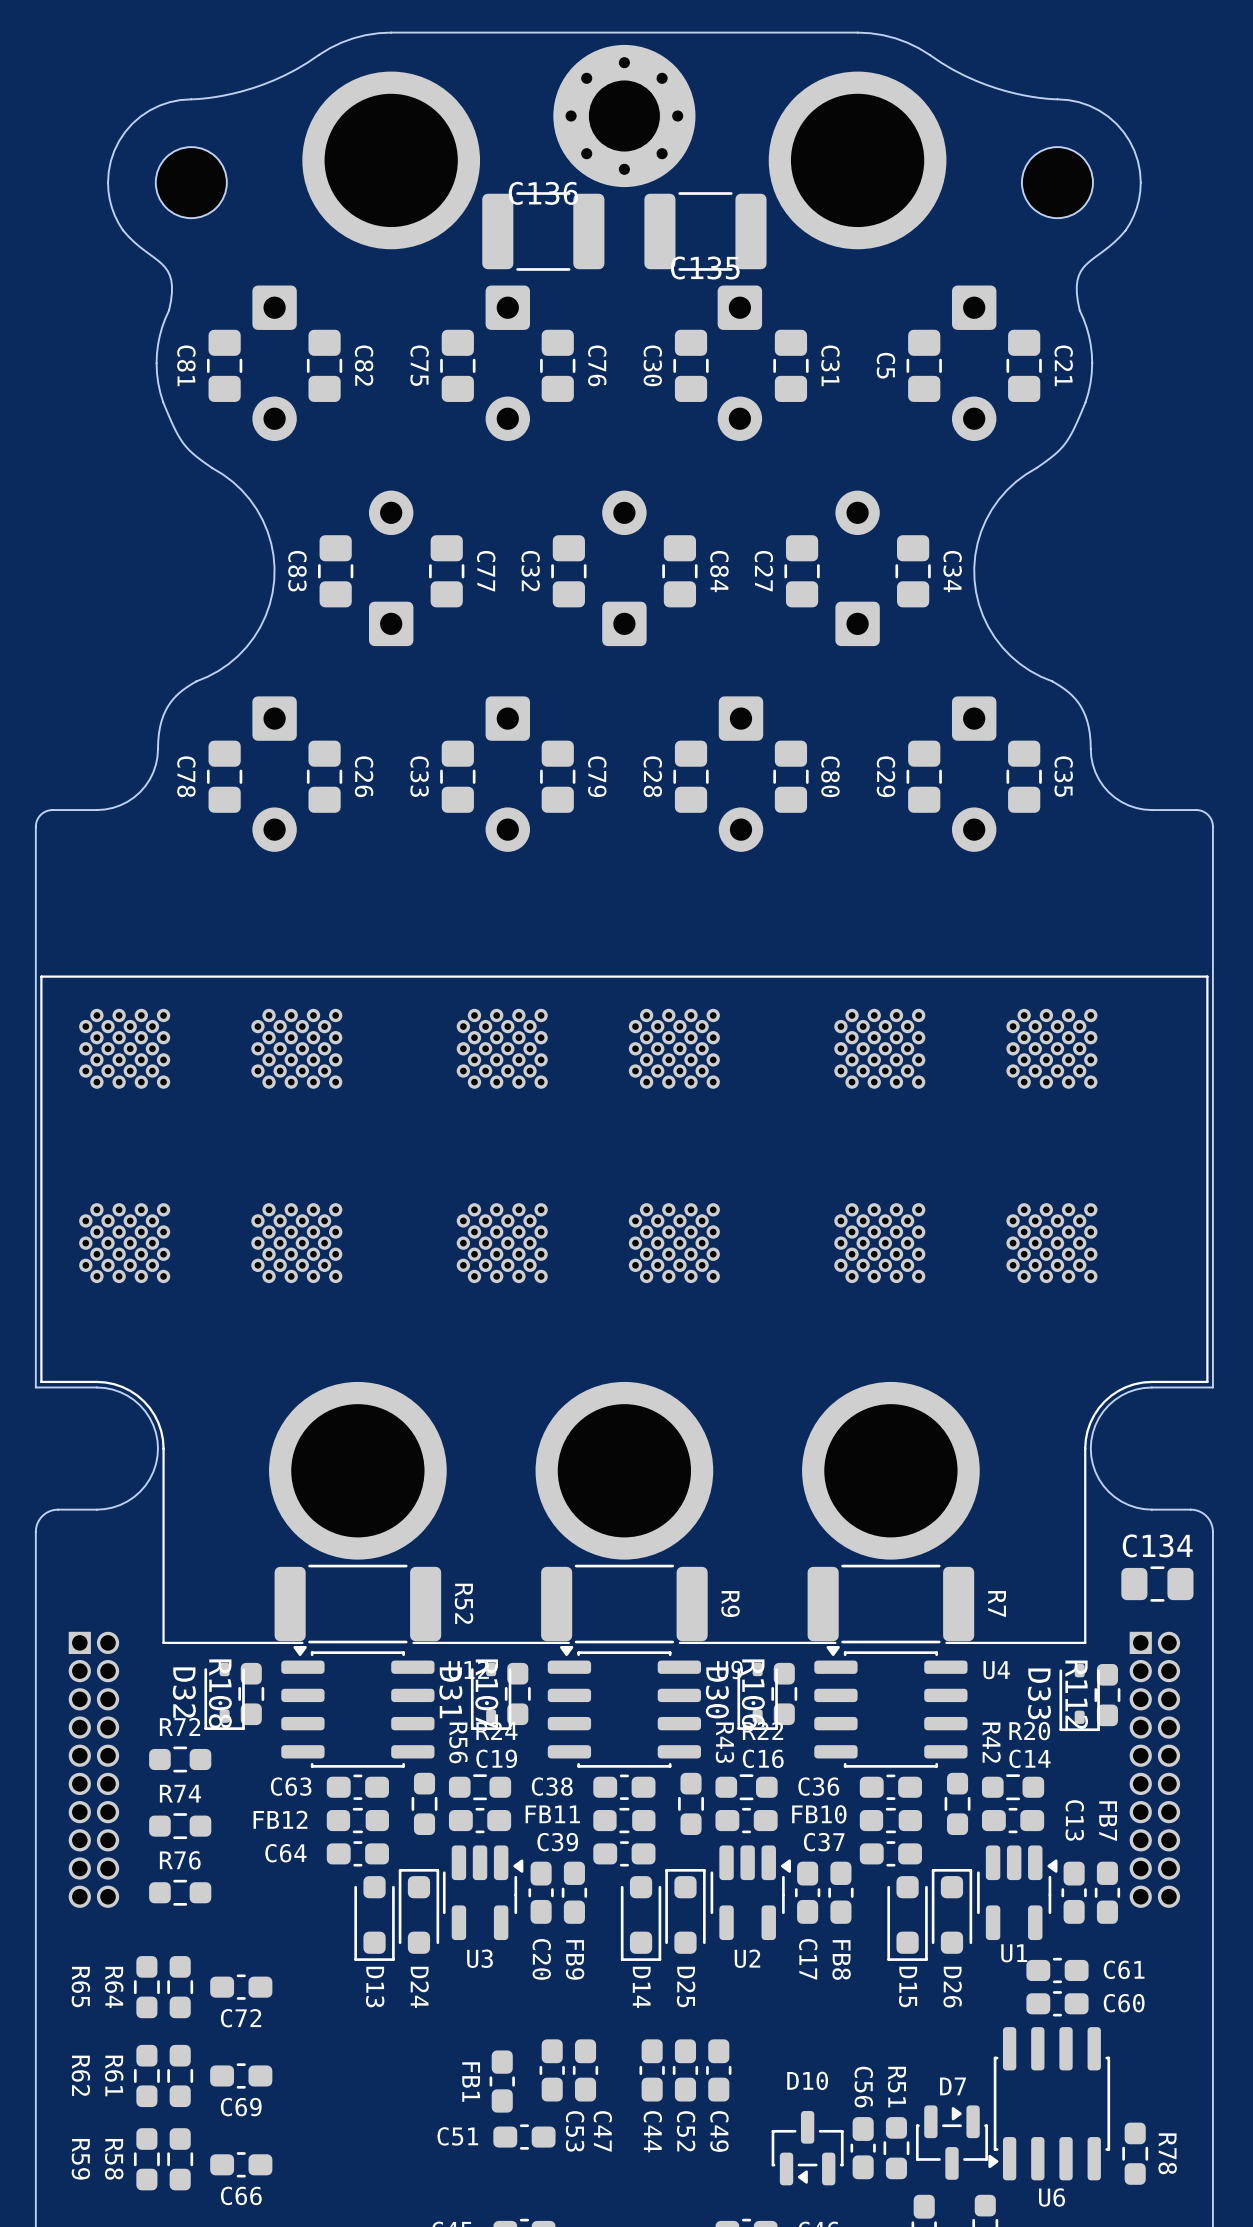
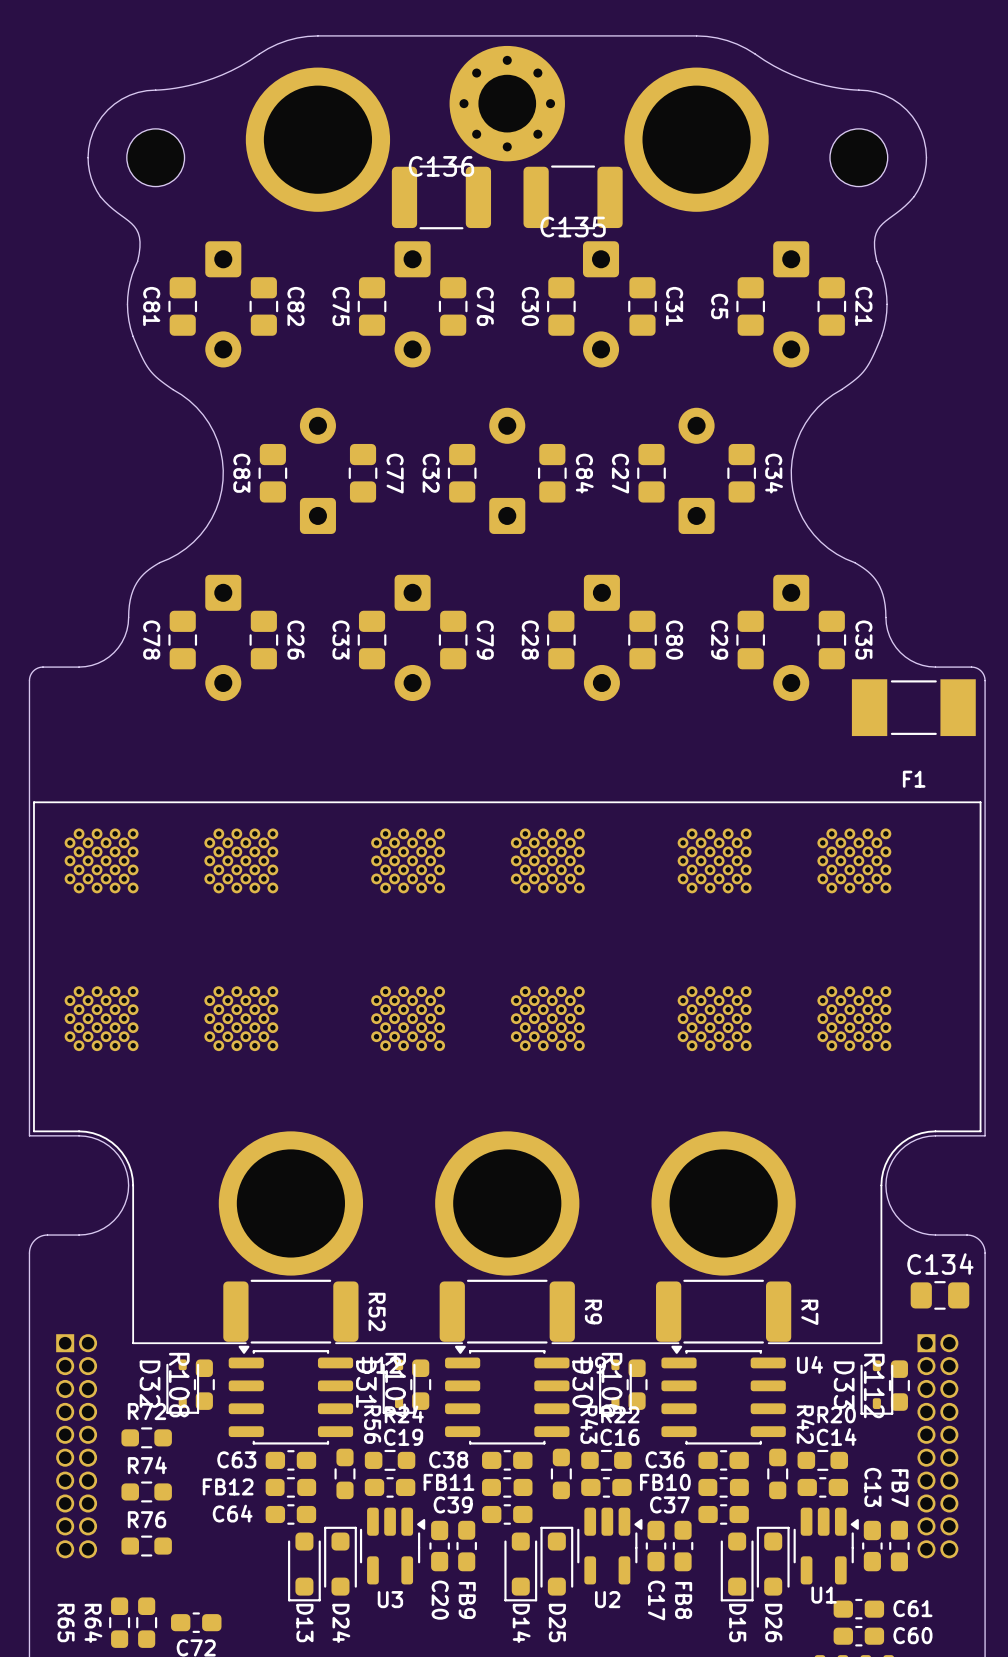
F1: none -> (913, 707)

